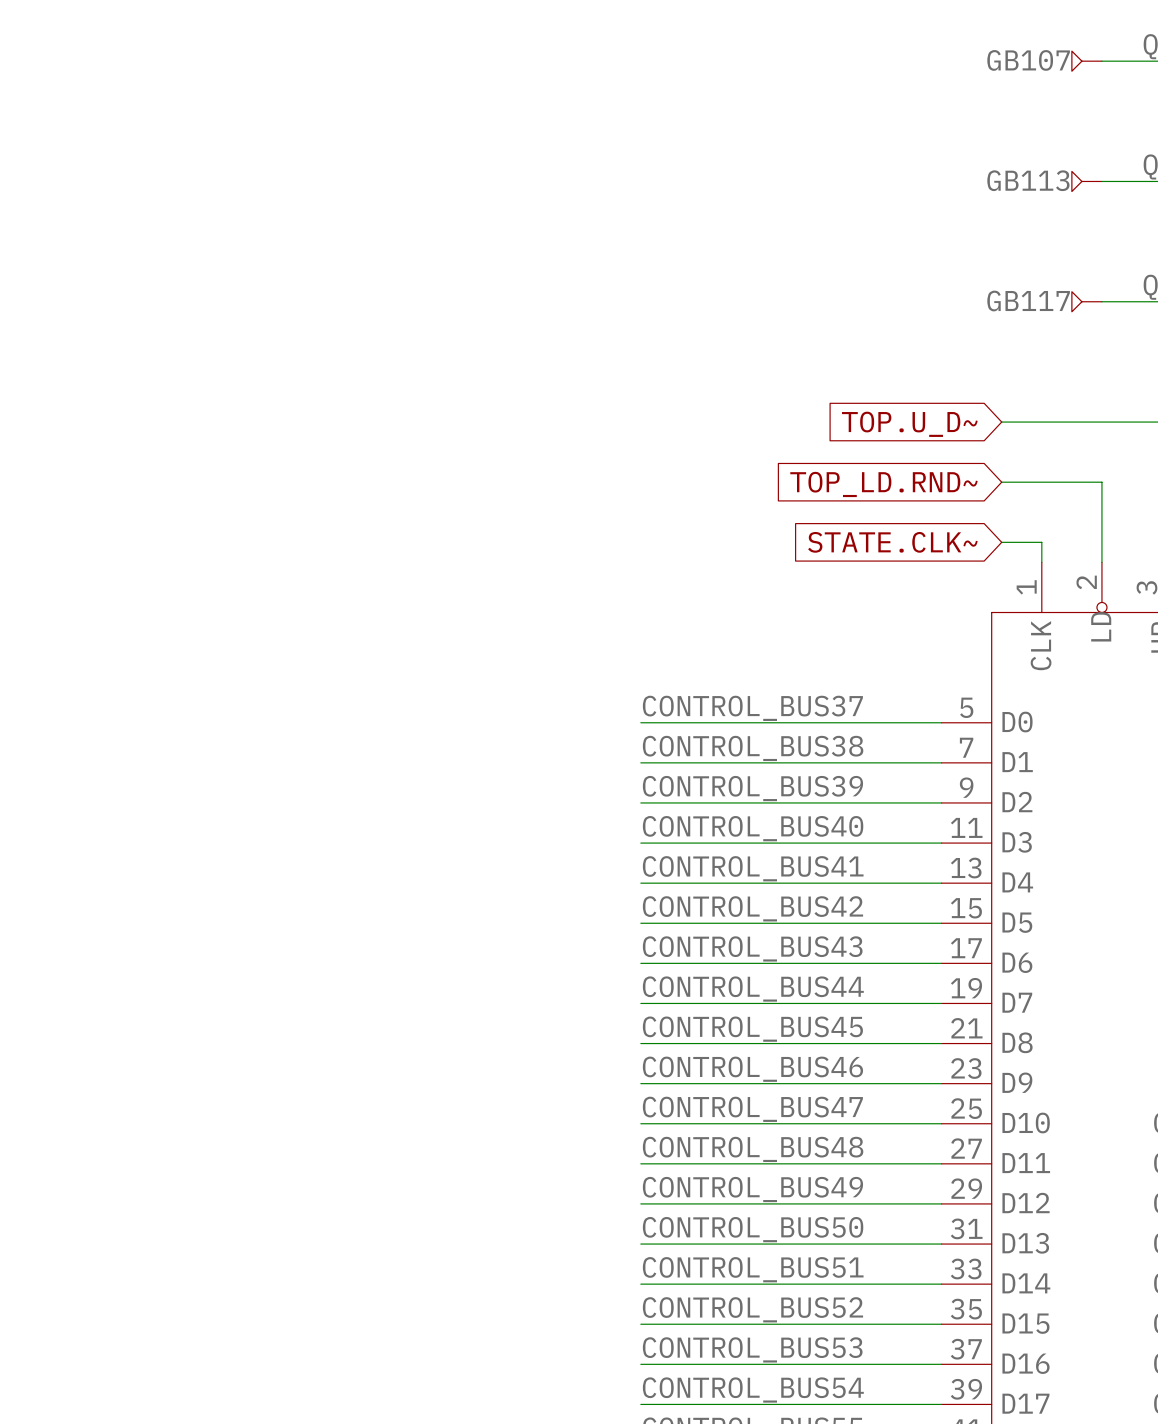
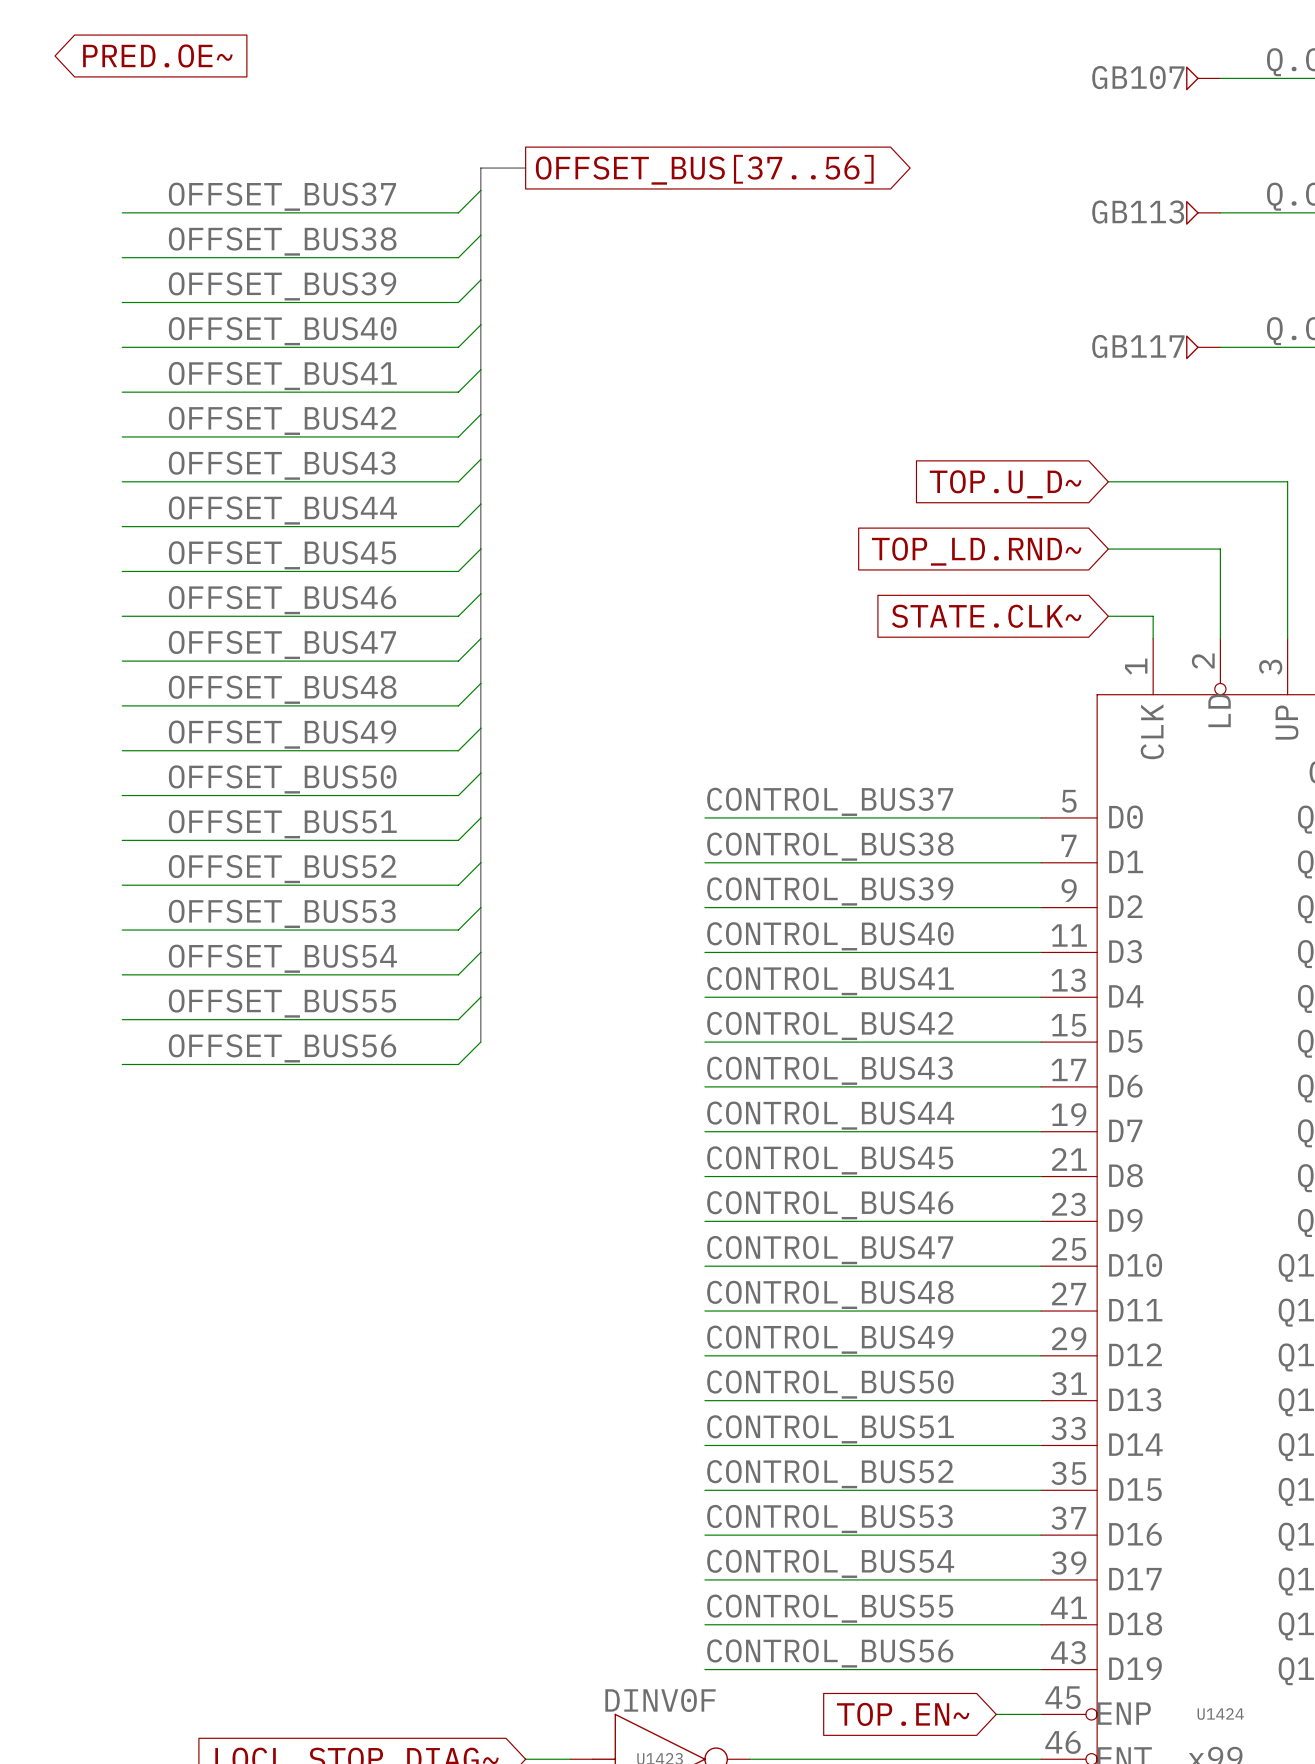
global label: none -> PRED.OE~ (157, 55)
bus: none -> (525, 168) (480, 168) (480, 1042)
global label: none -> OFFSET_BUS[37..56] (704, 169)
wire: none -> (480, 190) (458, 212) (122, 212)
label: none -> OFFSET_BUS37 (282, 196)
wire: none -> (480, 235) (458, 257) (122, 257)
label: none -> OFFSET_BUS38 (282, 241)
wire: none -> (480, 280) (458, 302) (122, 302)
label: none -> OFFSET_BUS39 (282, 286)
wire: none -> (480, 324) (458, 347) (122, 347)
label: none -> OFFSET_BUS40 (282, 331)
wire: none -> (480, 369) (458, 392) (122, 392)
label: none -> OFFSET_BUS41 (282, 376)
wire: none -> (480, 414) (458, 436) (122, 436)
label: none -> OFFSET_BUS42 (282, 420)
wire: none -> (480, 459) (458, 481) (122, 481)
label: none -> OFFSET_BUS43 (282, 465)
wire: none -> (480, 504) (458, 526) (122, 526)
label: none -> OFFSET_BUS44 (282, 510)
wire: none -> (480, 549) (458, 571) (122, 571)
label: none -> OFFSET_BUS45 (282, 555)
wire: none -> (480, 593) (458, 616) (122, 616)
label: none -> OFFSET_BUS46 (282, 600)
wire: none -> (480, 638) (458, 661) (122, 661)
label: none -> OFFSET_BUS47 (282, 644)
wire: none -> (480, 683) (458, 705) (122, 705)
label: none -> OFFSET_BUS48 (282, 689)
wire: none -> (480, 728) (458, 750) (122, 750)
label: none -> OFFSET_BUS49 (282, 734)
wire: none -> (480, 773) (458, 795) (122, 795)
label: none -> OFFSET_BUS50 (282, 779)
wire: none -> (480, 817) (458, 840) (122, 840)
label: none -> OFFSET_BUS51 (282, 824)
wire: none -> (480, 862) (458, 885) (122, 885)
label: none -> OFFSET_BUS52 (282, 869)
wire: none -> (480, 907) (458, 930) (122, 930)
label: none -> OFFSET_BUS53 (282, 913)
wire: none -> (480, 952) (458, 974) (122, 974)
label: none -> OFFSET_BUS54 (282, 958)
wire: none -> (480, 997) (458, 1019) (122, 1019)
label: none -> OFFSET_BUS55 (282, 1003)
wire: none -> (480, 1042) (458, 1064) (122, 1064)
label: none -> OFFSET_BUS56 (282, 1048)

